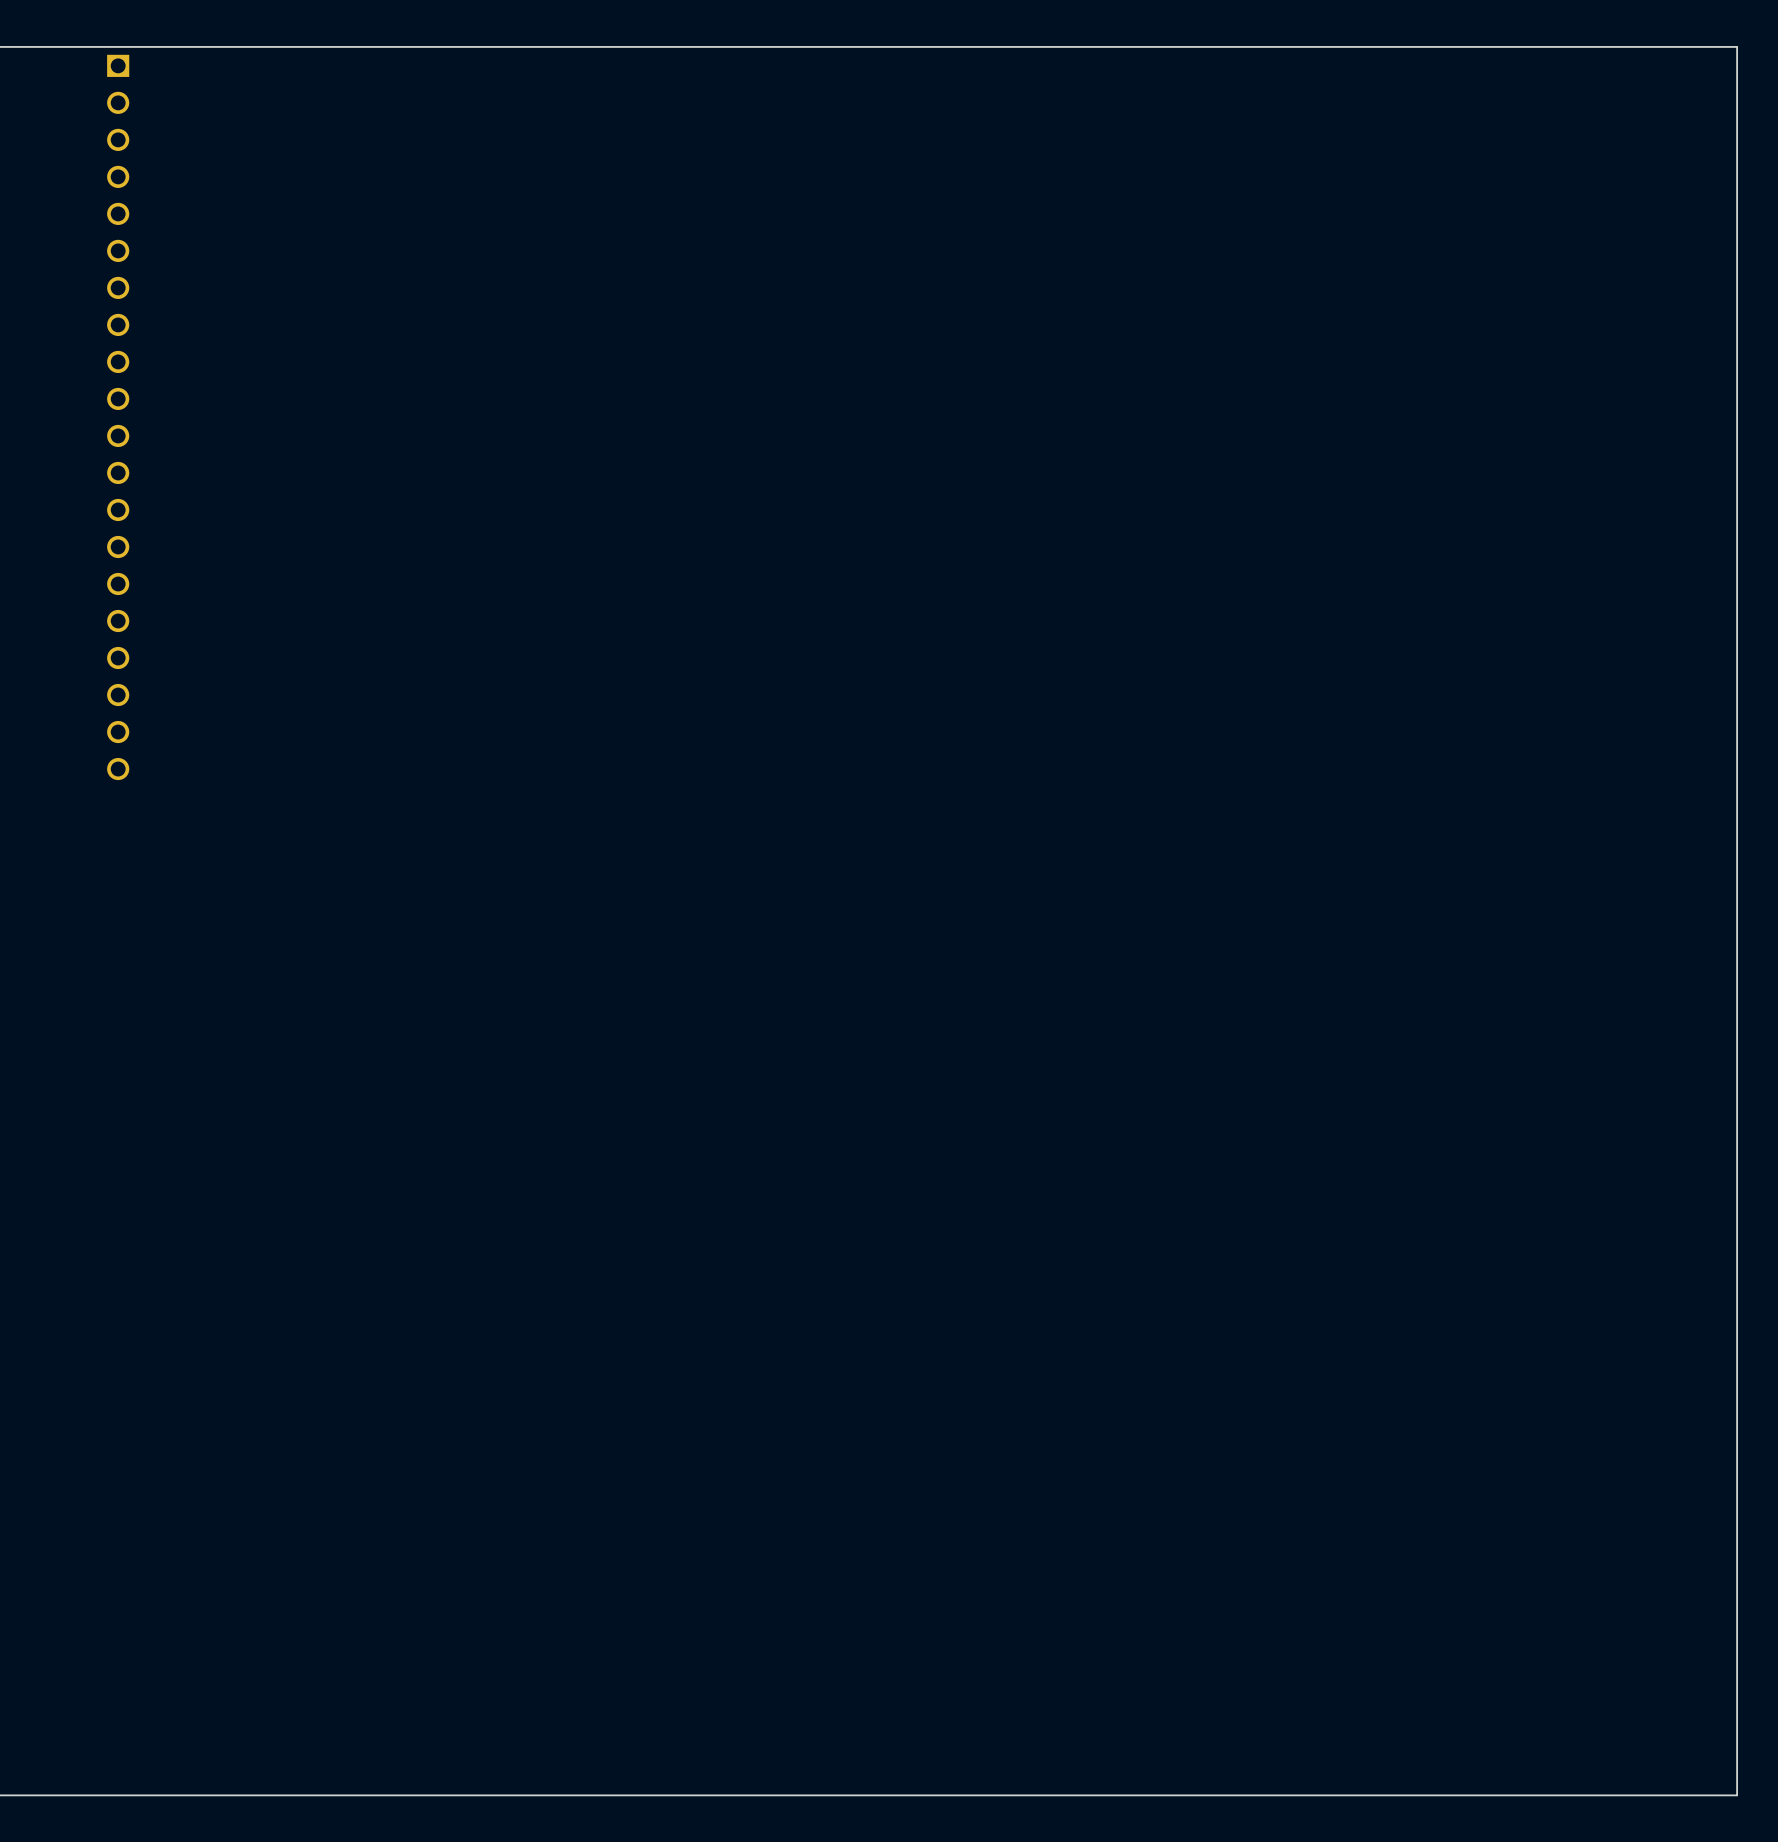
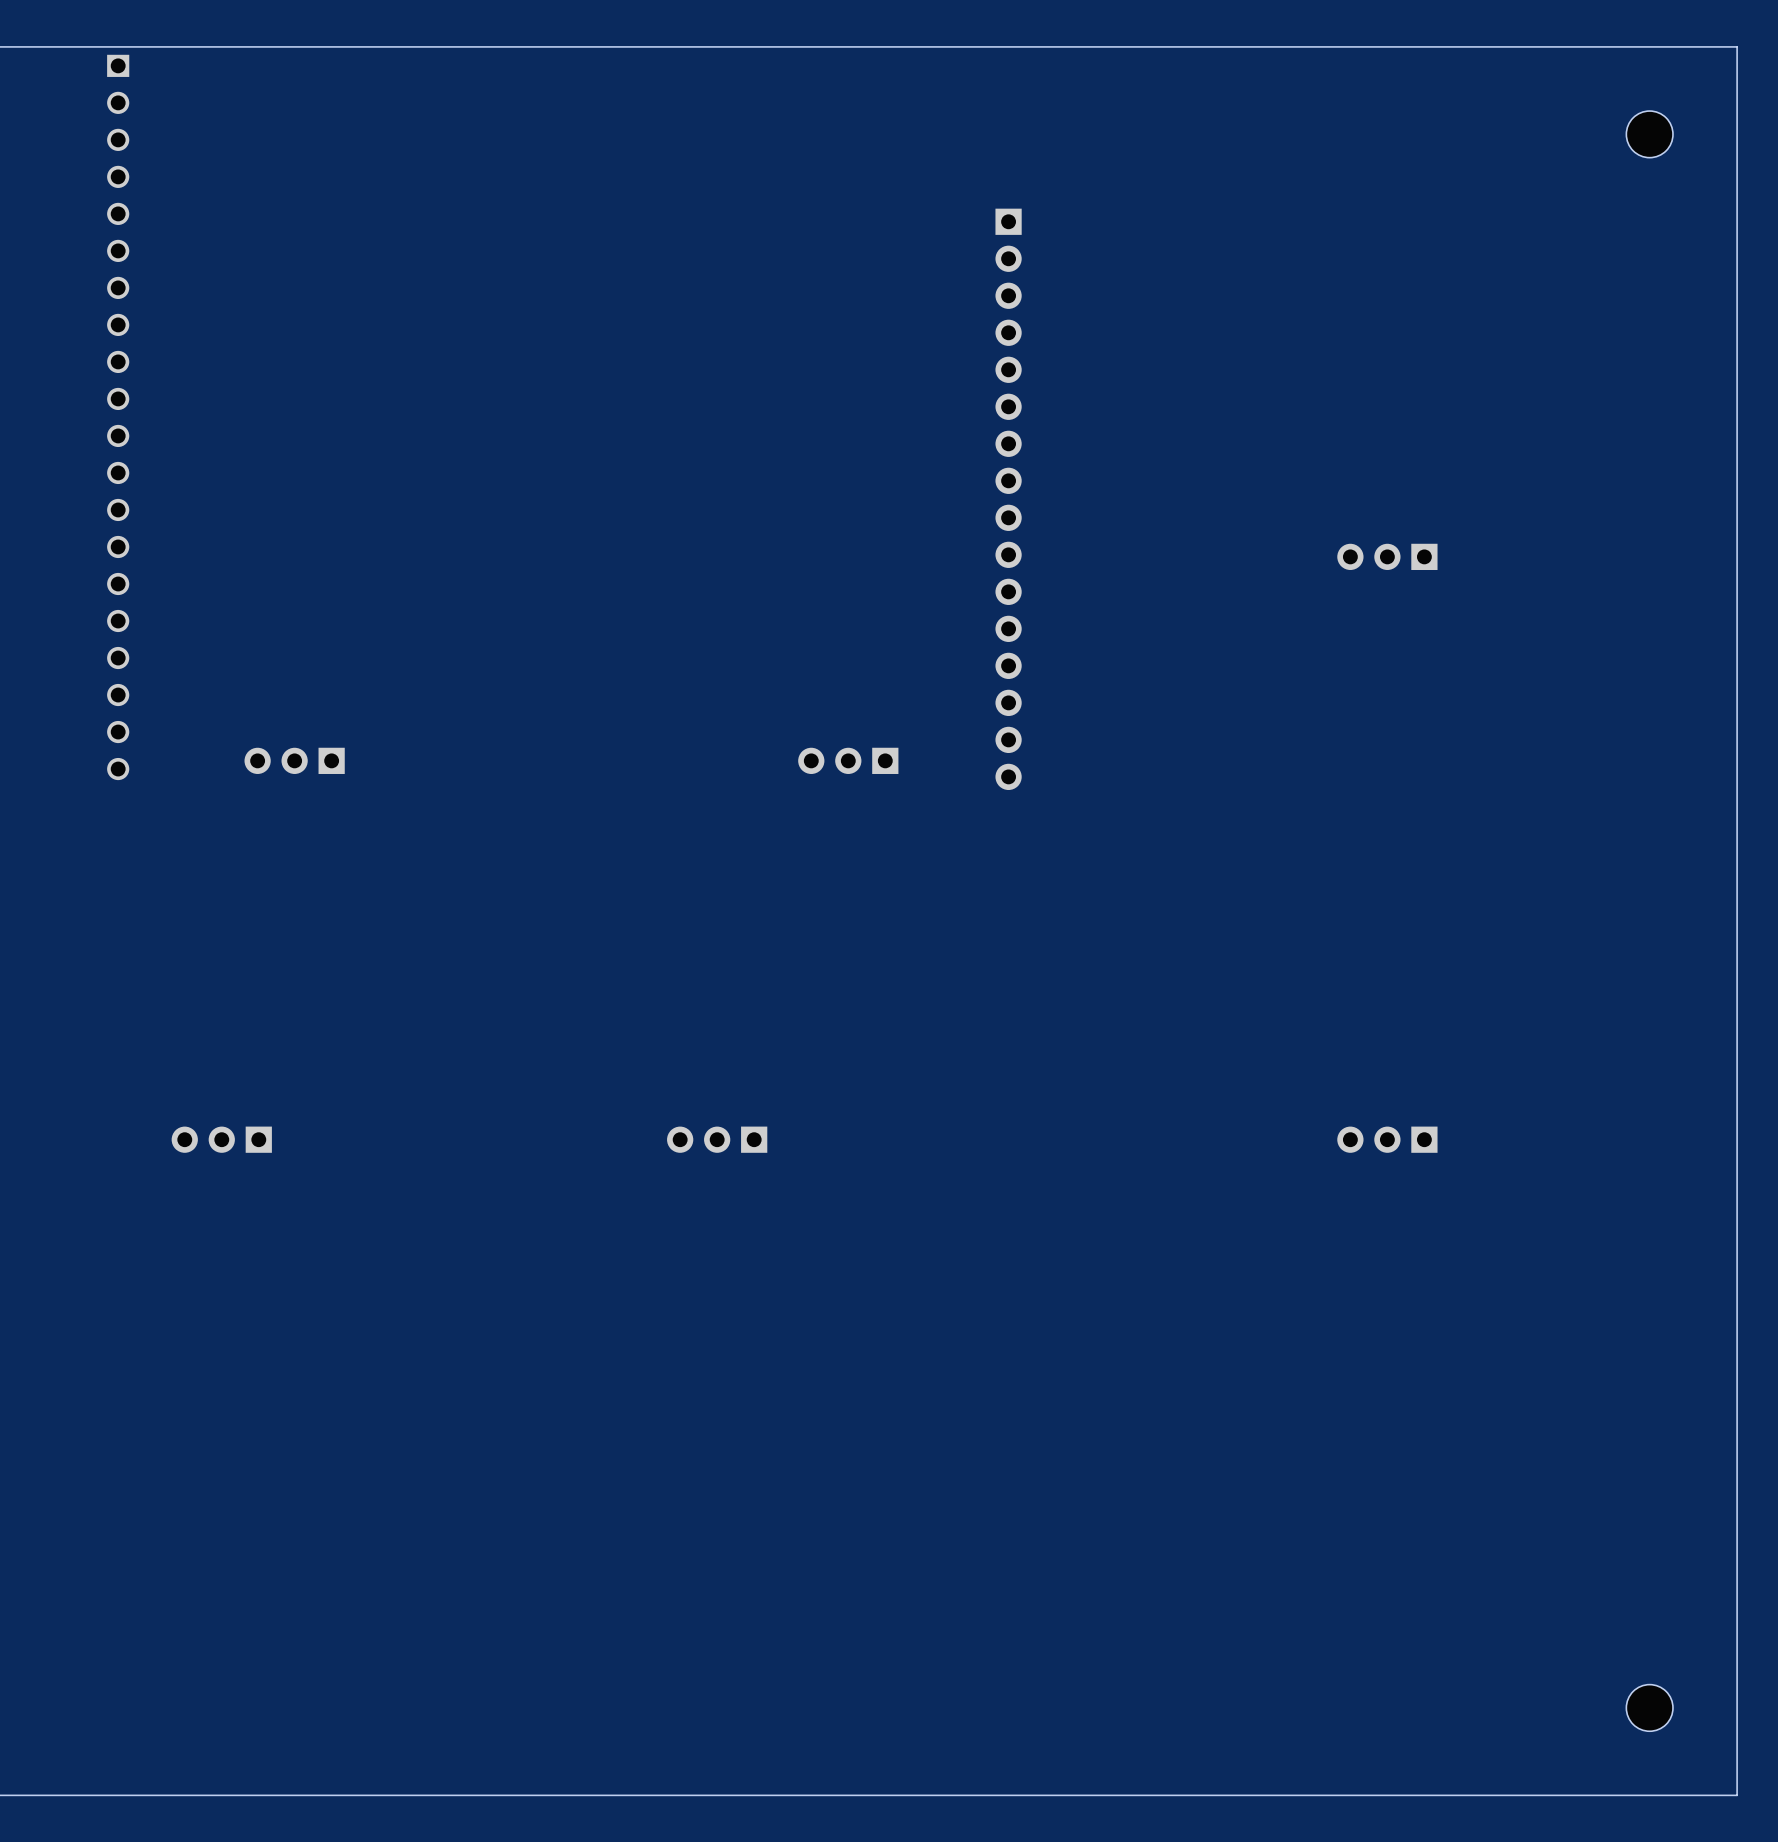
part: none -> (1649, 134)
part: none -> (1008, 499)
part: none -> (1387, 556)
part: none -> (294, 760)
part: none -> (848, 760)
part: none -> (221, 1139)
part: none -> (717, 1139)
part: none -> (1387, 1139)
part: none -> (1649, 1707)

